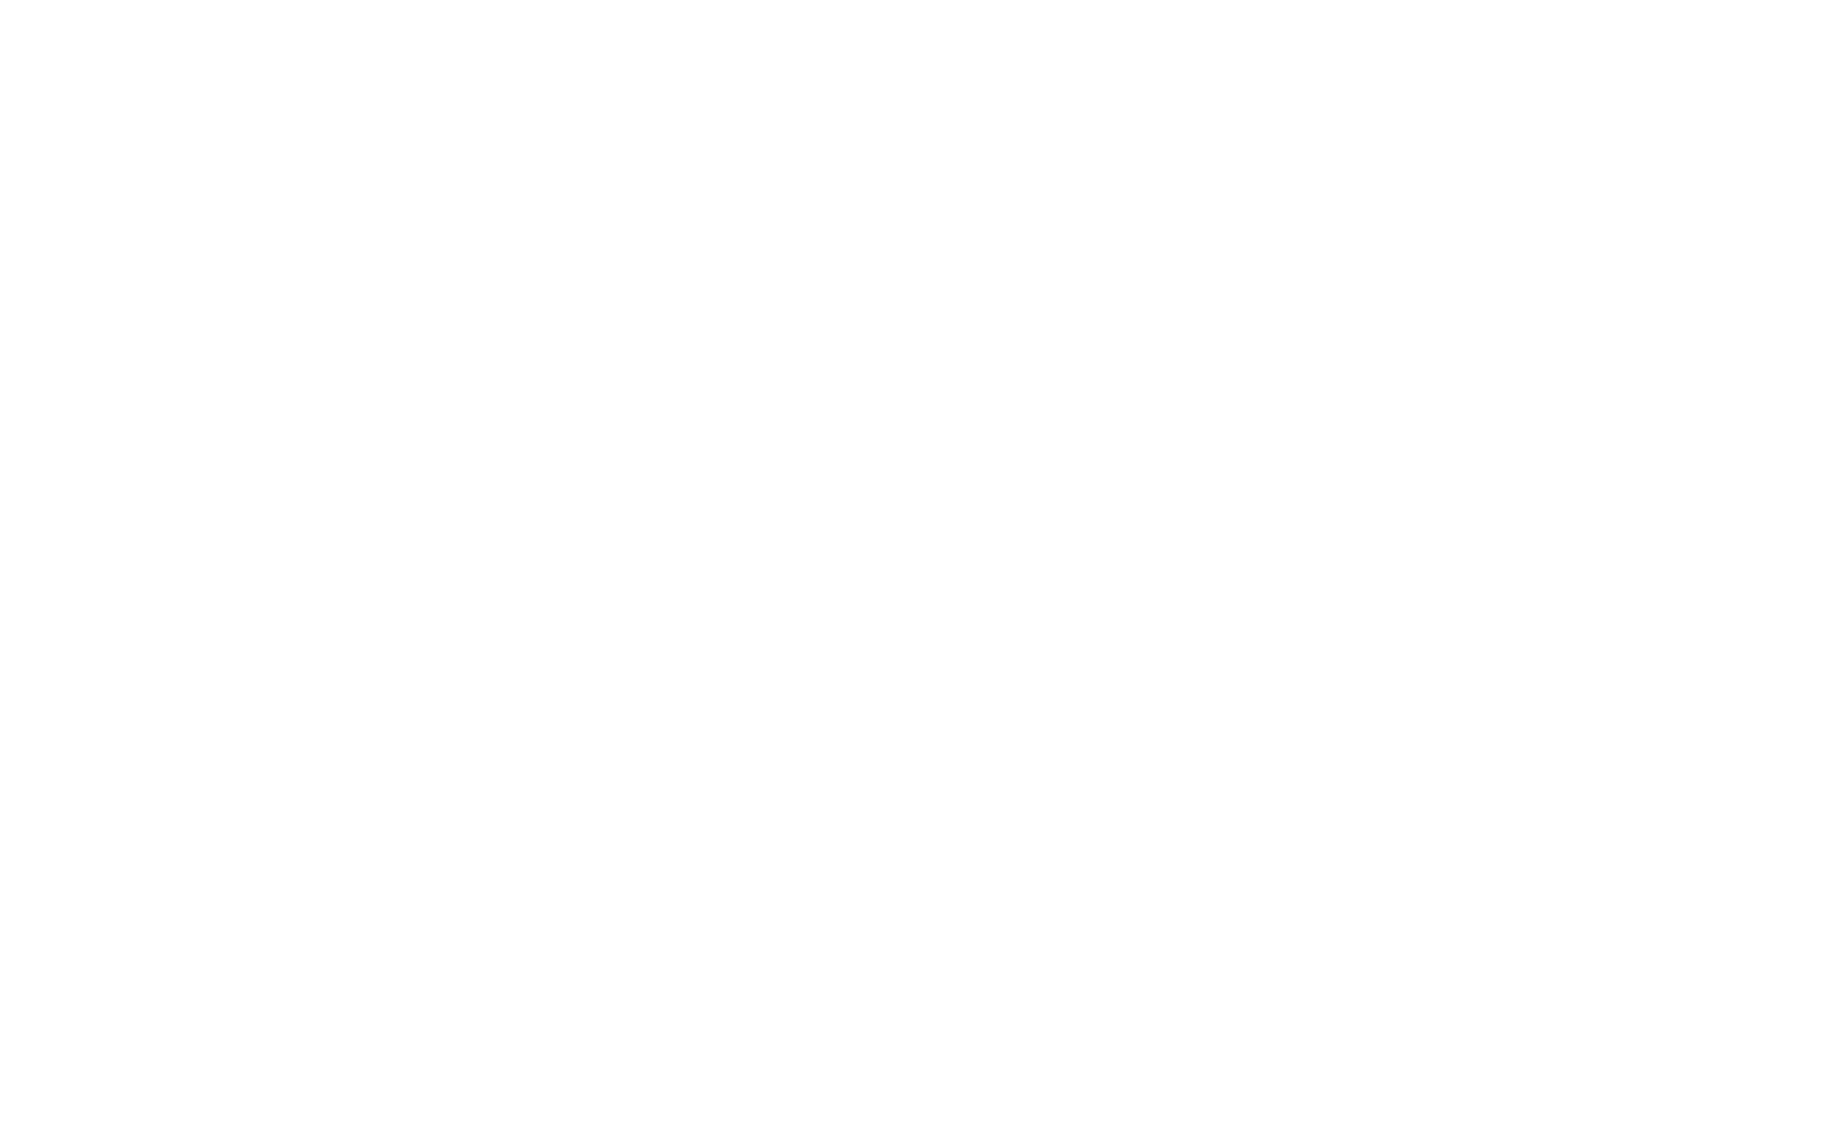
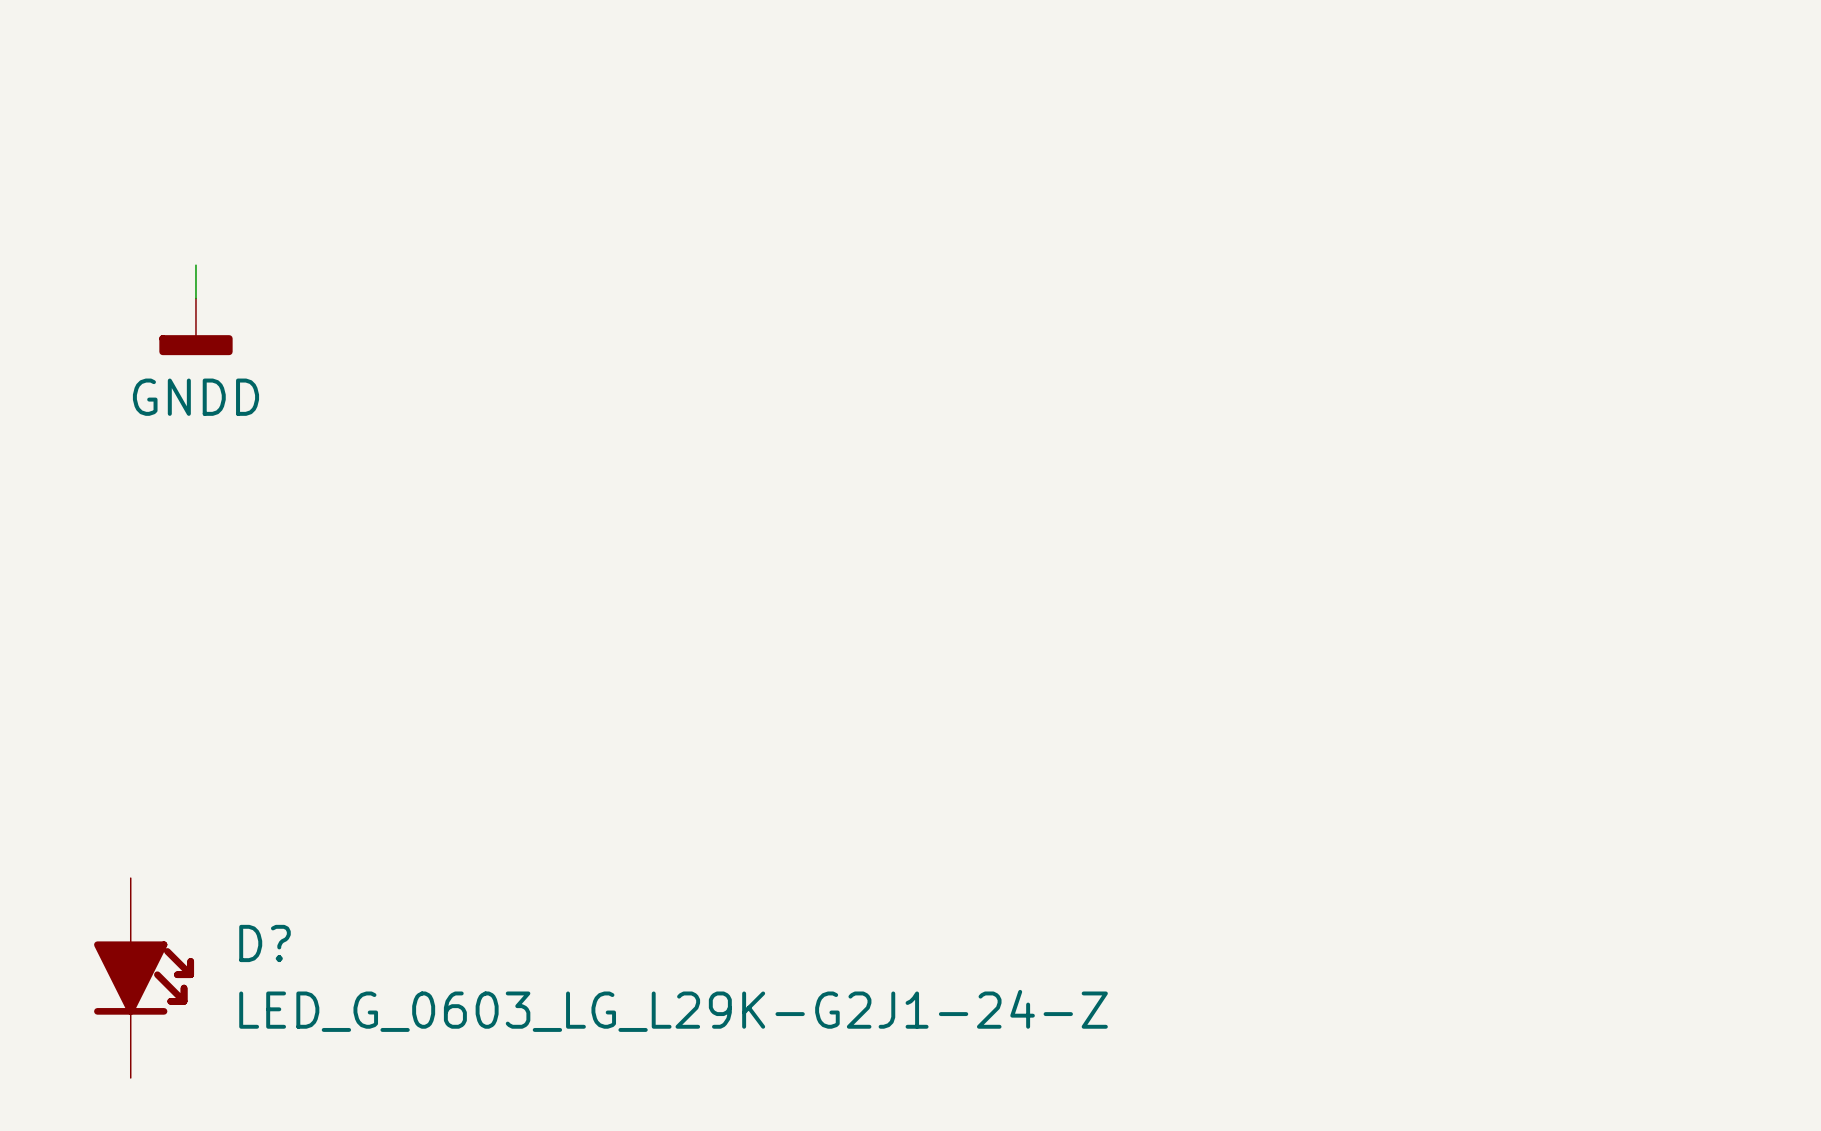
wire: none -> (195, 265) (195, 298)
power symbol: none -> GNDD (195, 326)
D?: none -> LED_G_0603_LG_L29K-G2J1-24-Z (144, 978)

